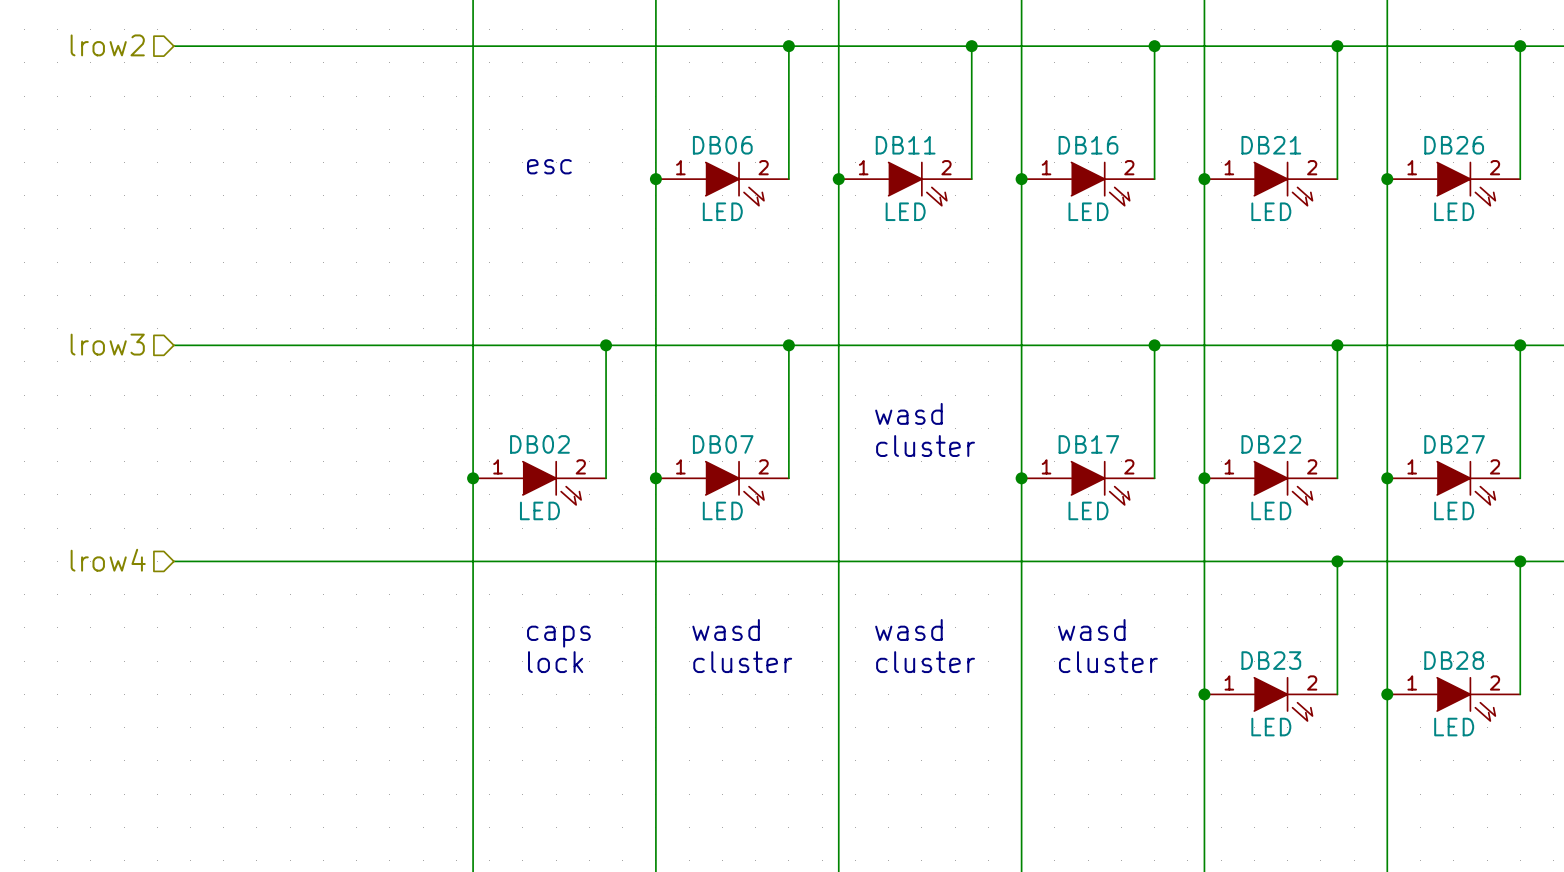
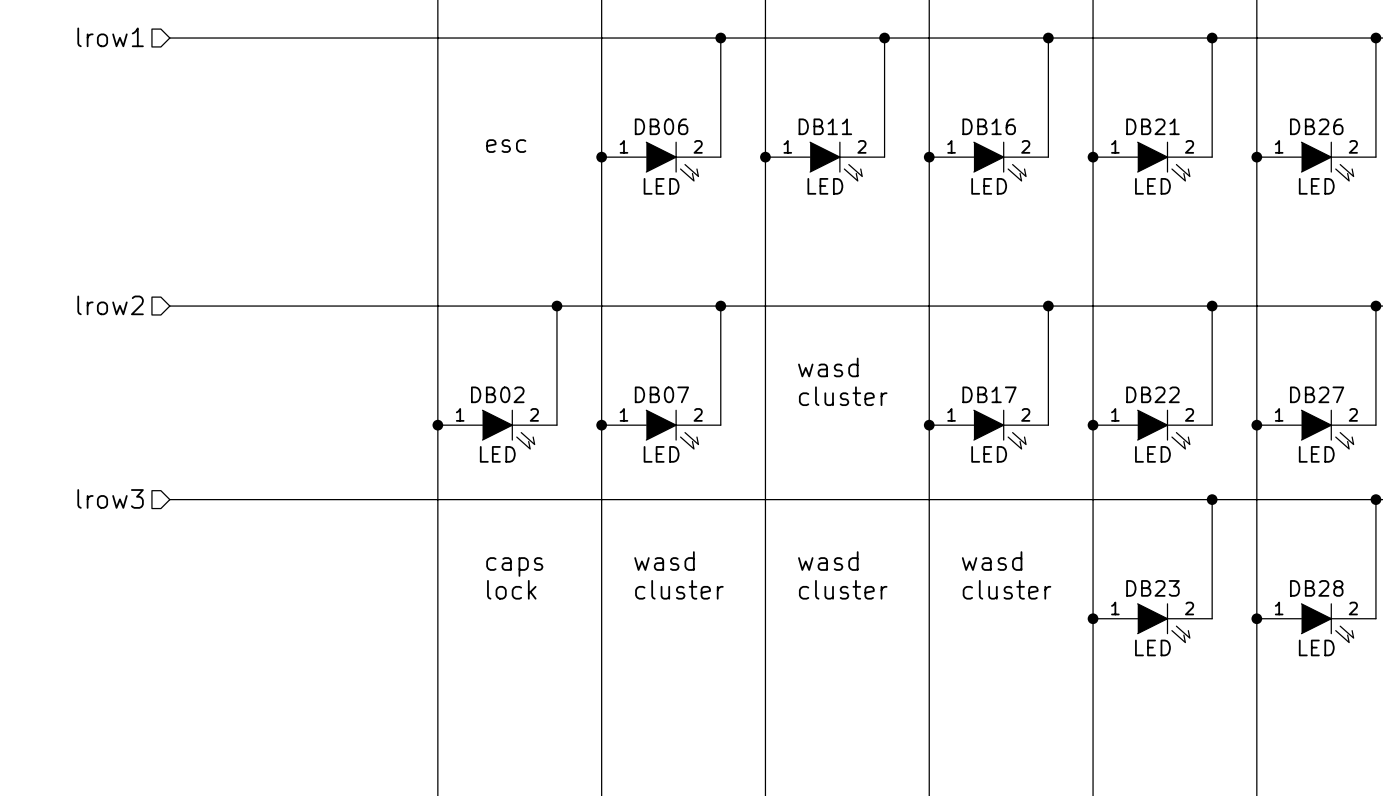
hierarchical label: lrow2 (107, 45) -> lrow1 (110, 37)
hierarchical label: lrow3 (107, 344) -> lrow2 (110, 305)
hierarchical label: lrow4 (108, 560) -> lrow3 (110, 498)

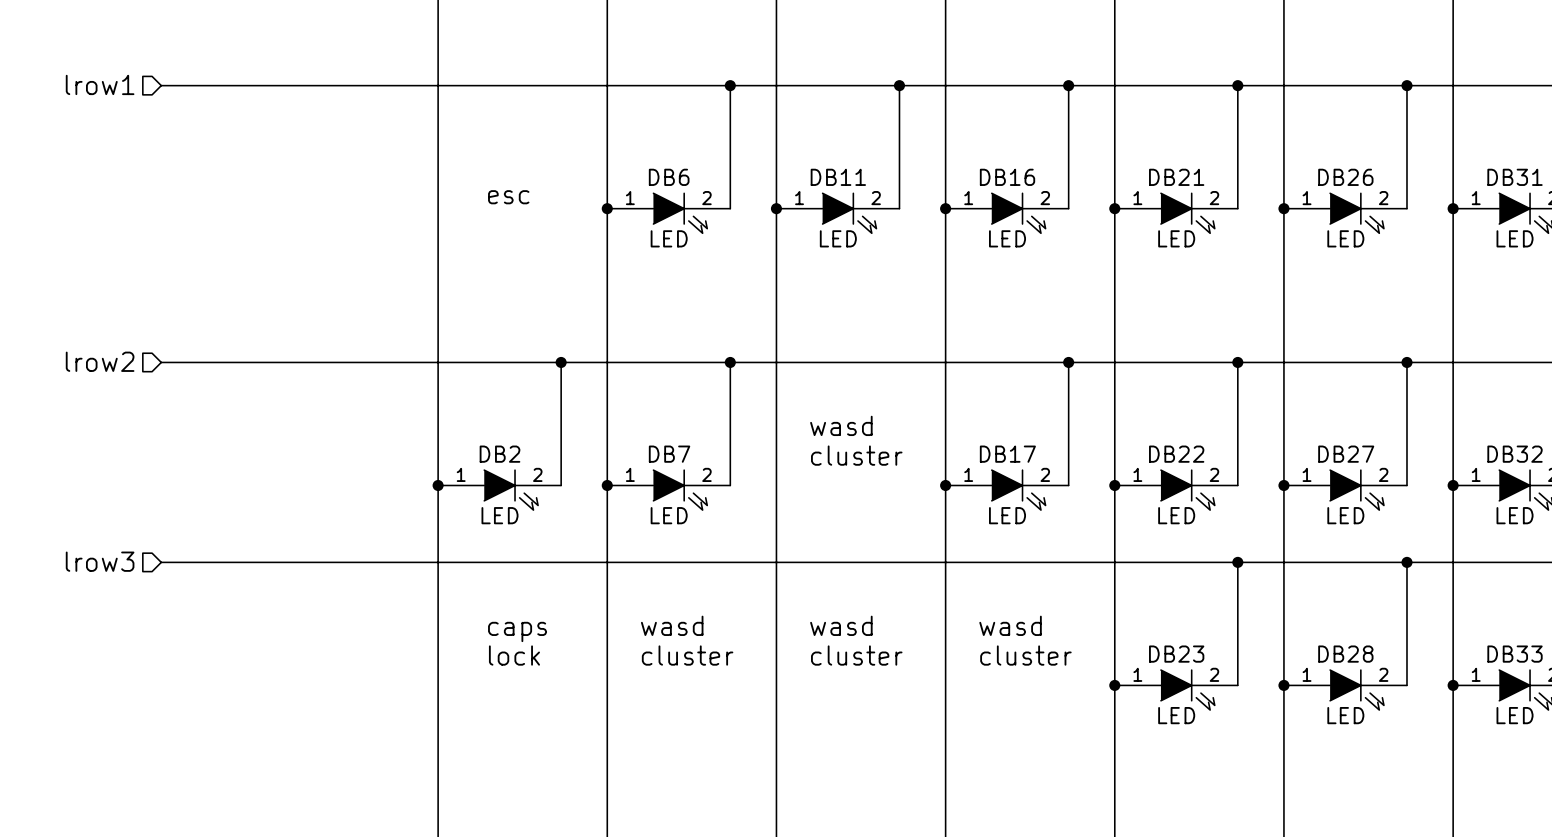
DB06 name: DB06 (661, 126) -> DB6 (669, 177)
DB02 name: DB02 (497, 394) -> DB2 (499, 454)
DB07 name: DB07 (661, 394) -> DB7 (669, 454)

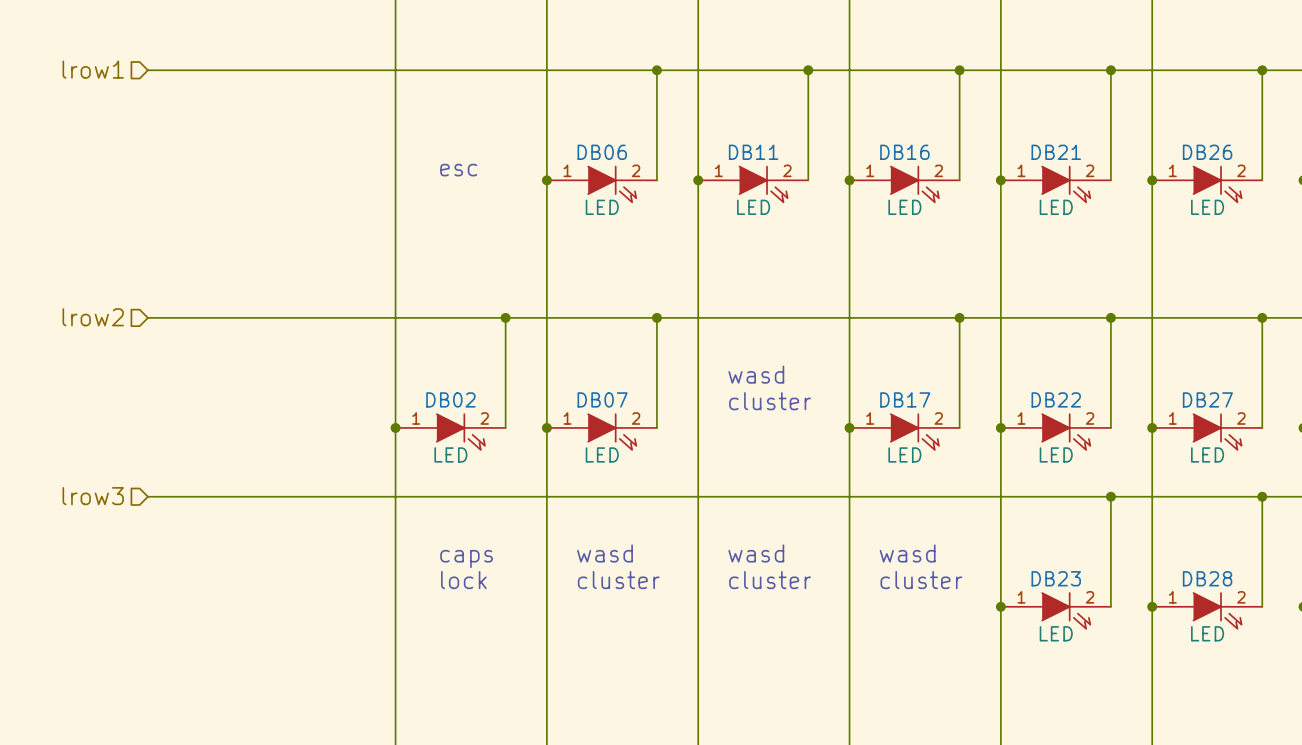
DB6 name: DB6 (669, 177) -> DB06 (602, 152)
DB2 name: DB2 (499, 454) -> DB02 (450, 399)
DB7 name: DB7 (669, 454) -> DB07 (602, 399)

